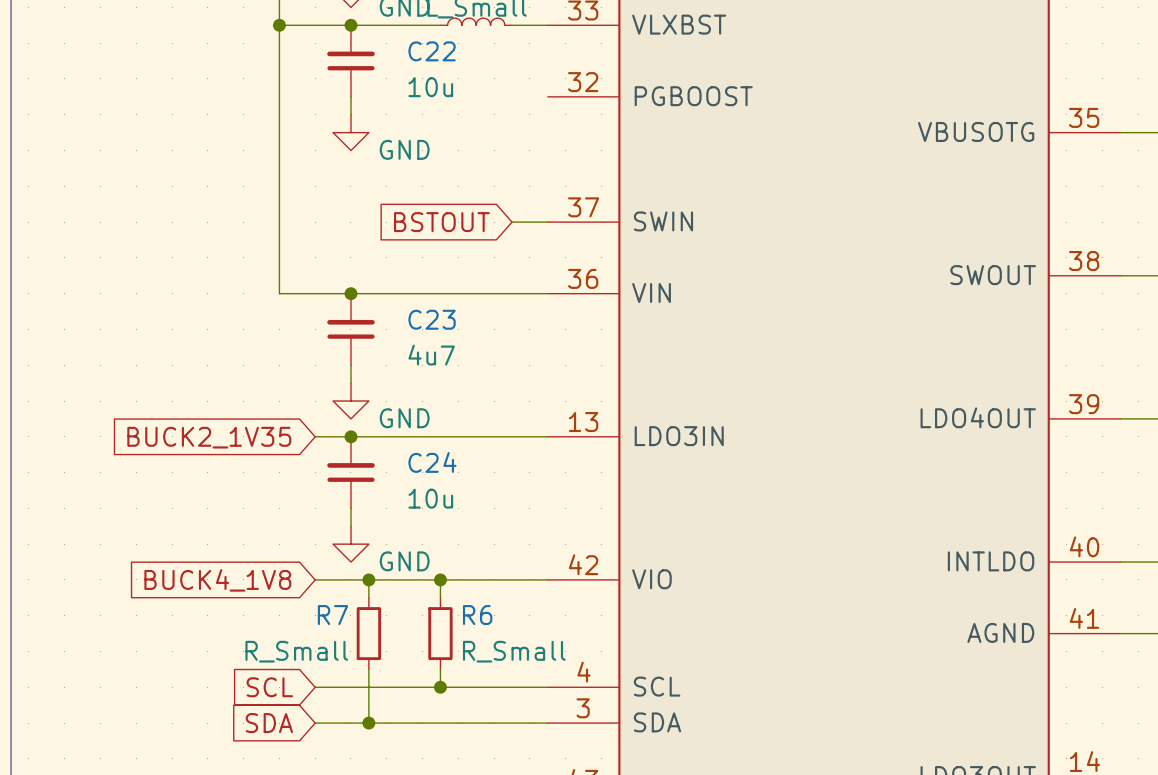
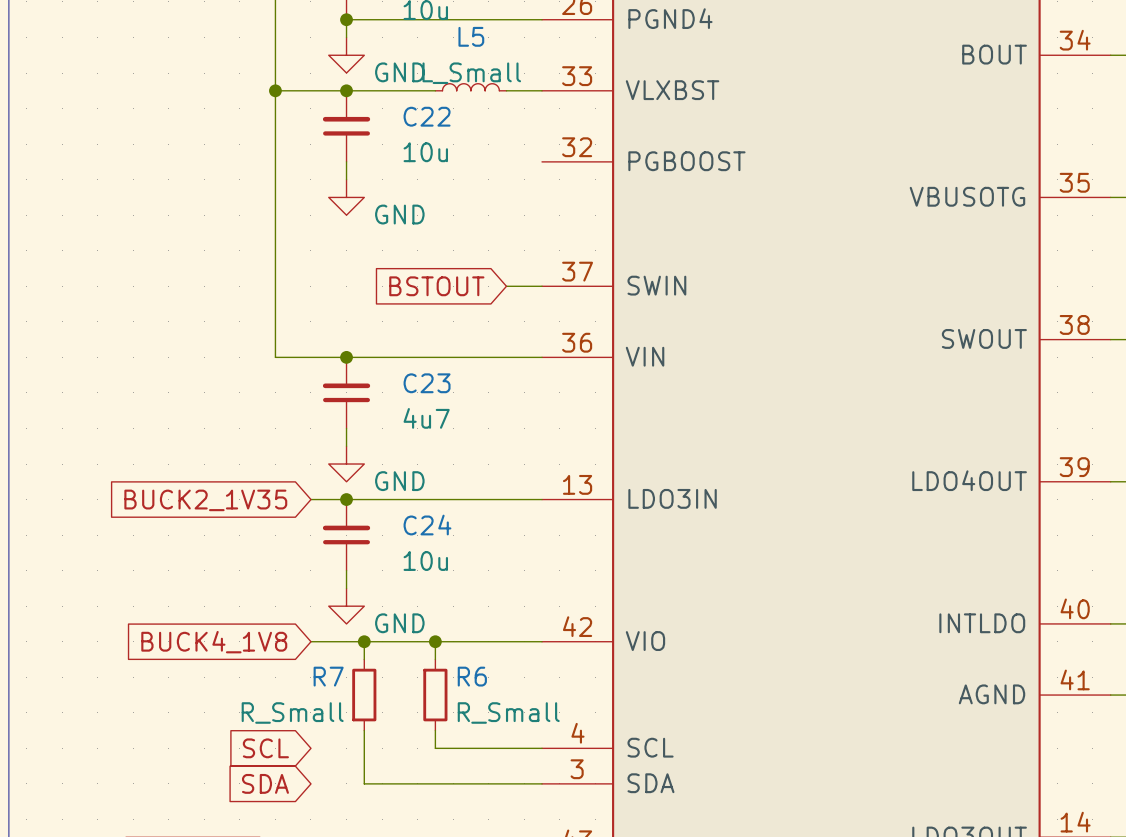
wire: (315, 687) (440, 687) -> none
junction: (440, 687) -> none
wire: (315, 723) (368, 723) -> none
junction: (368, 723) -> none

